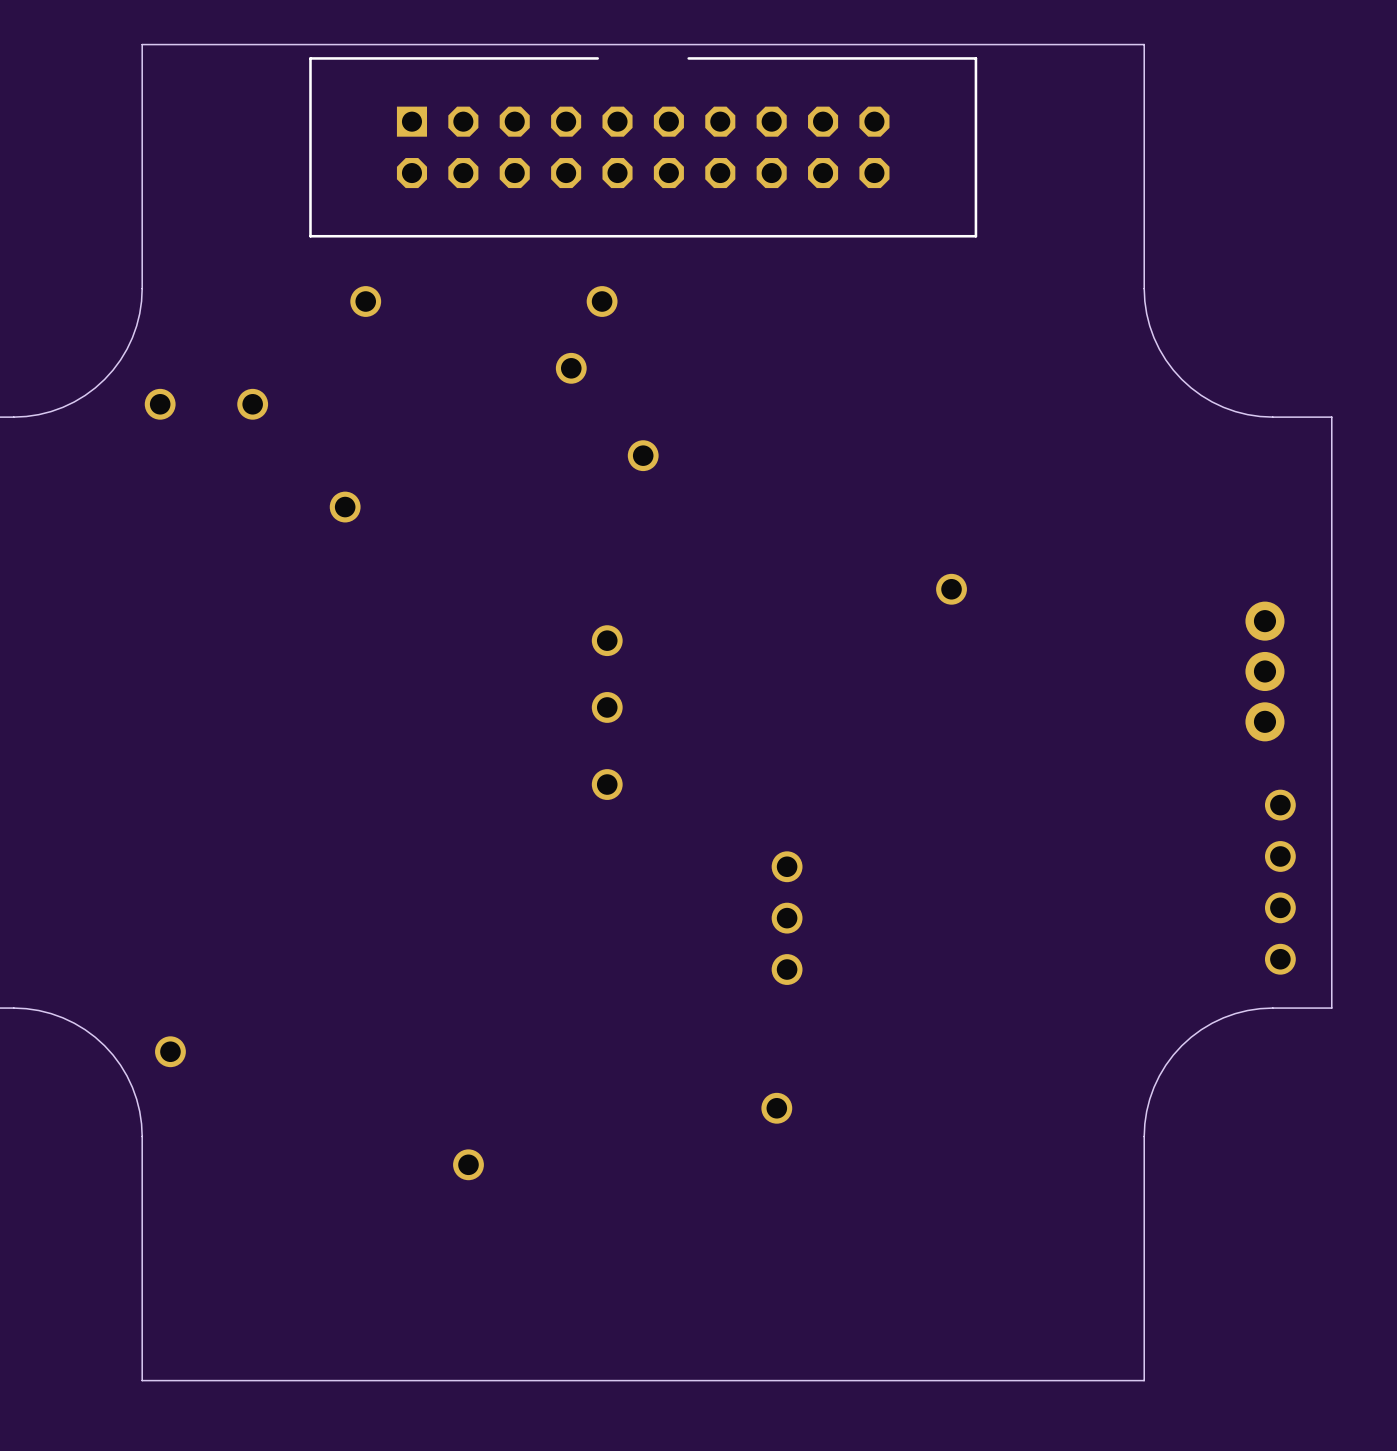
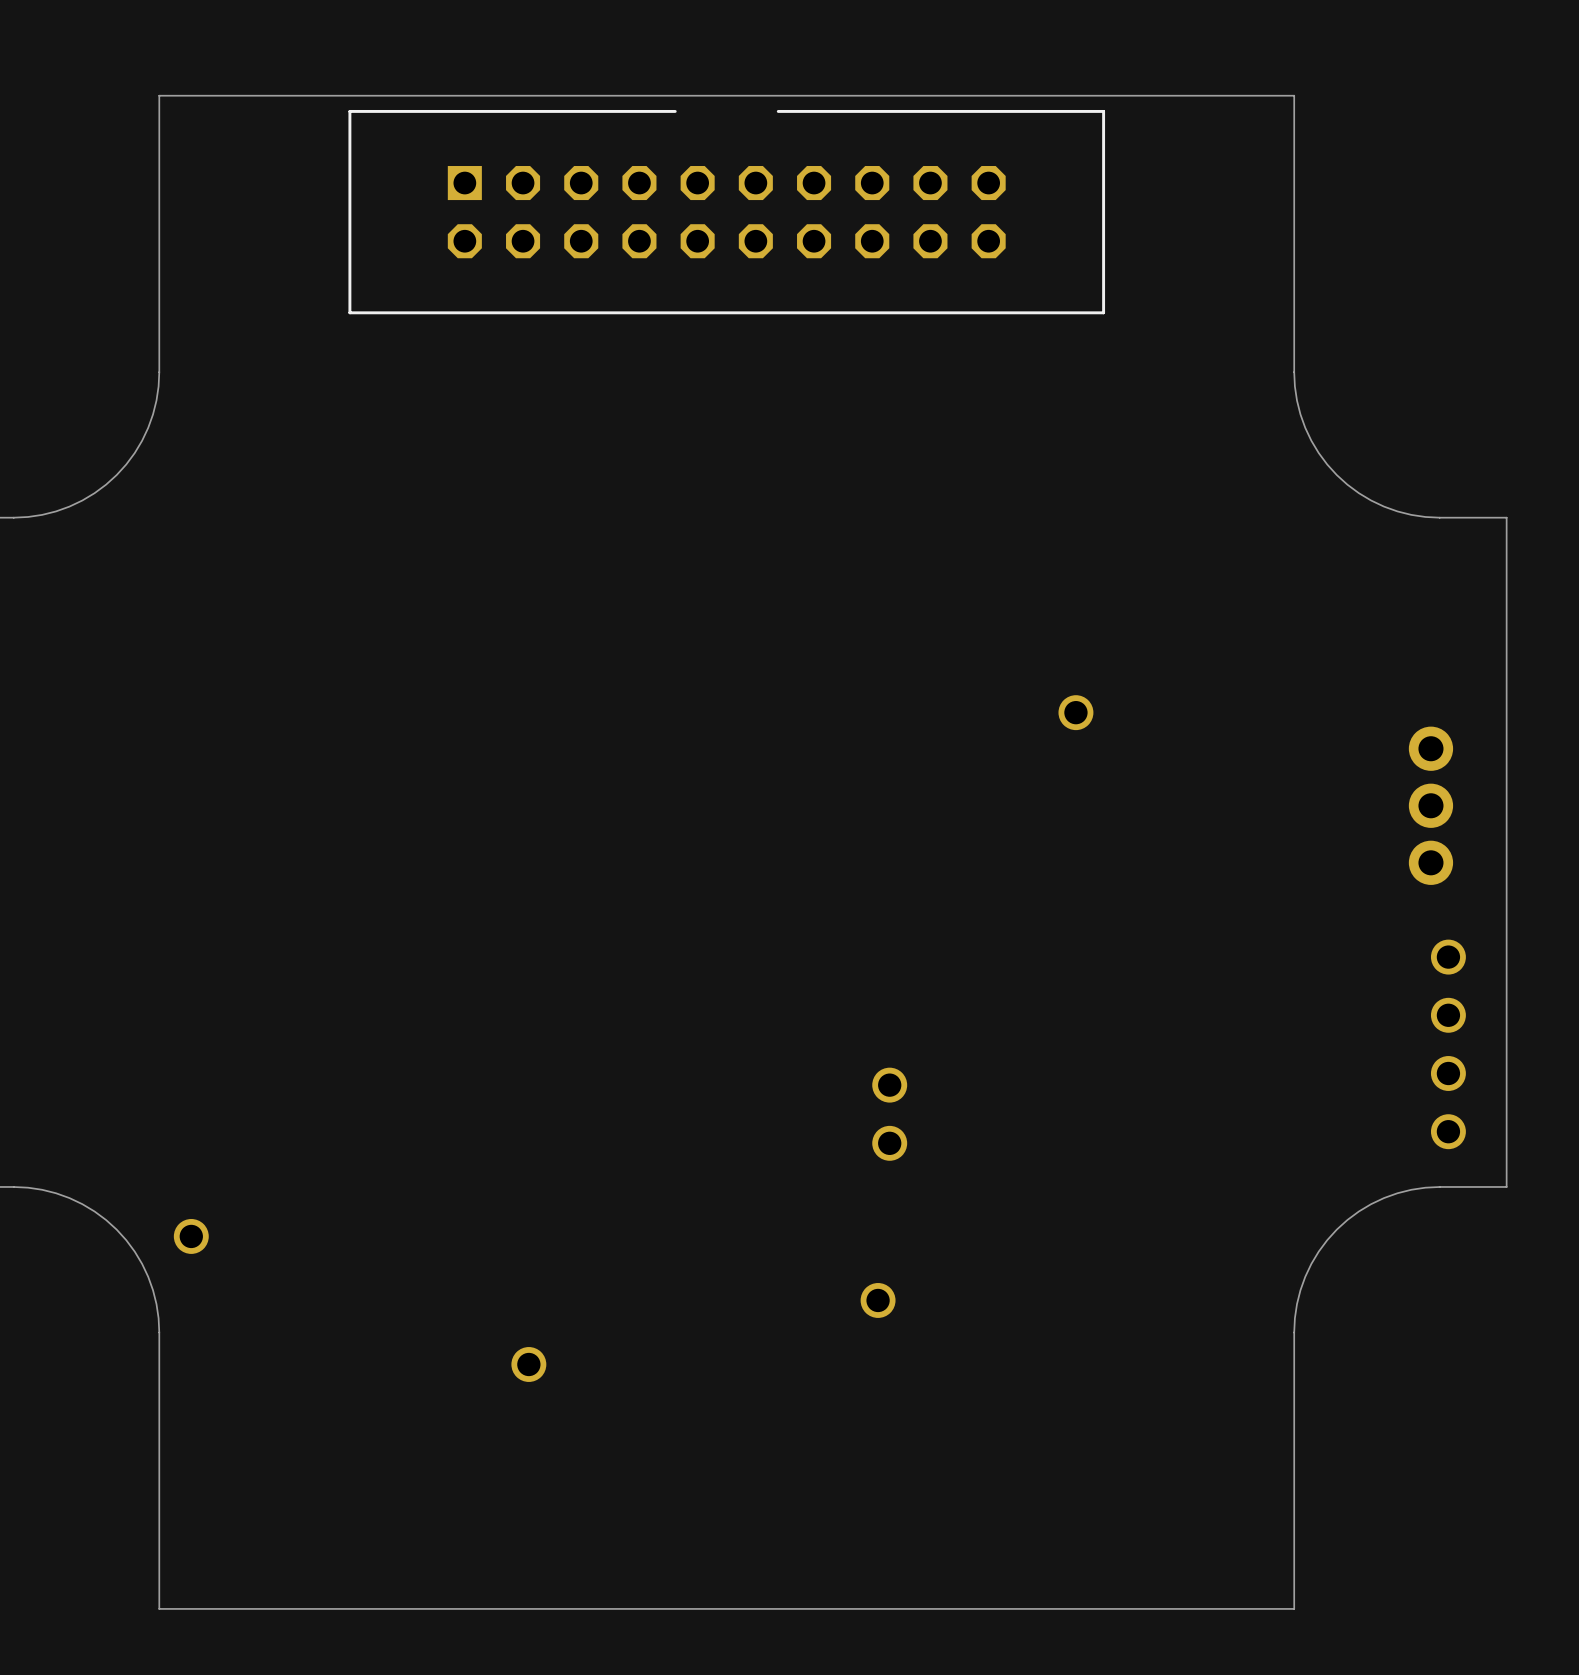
part: (365, 301) -> none
part: (602, 301) -> none
part: (571, 368) -> none
part: (160, 404) -> none
part: (252, 404) -> none
part: (643, 455) -> none
part: (345, 507) -> none
part: (607, 640) -> none
part: (607, 707) -> none
part: (607, 784) -> none
part: (787, 866) -> none

